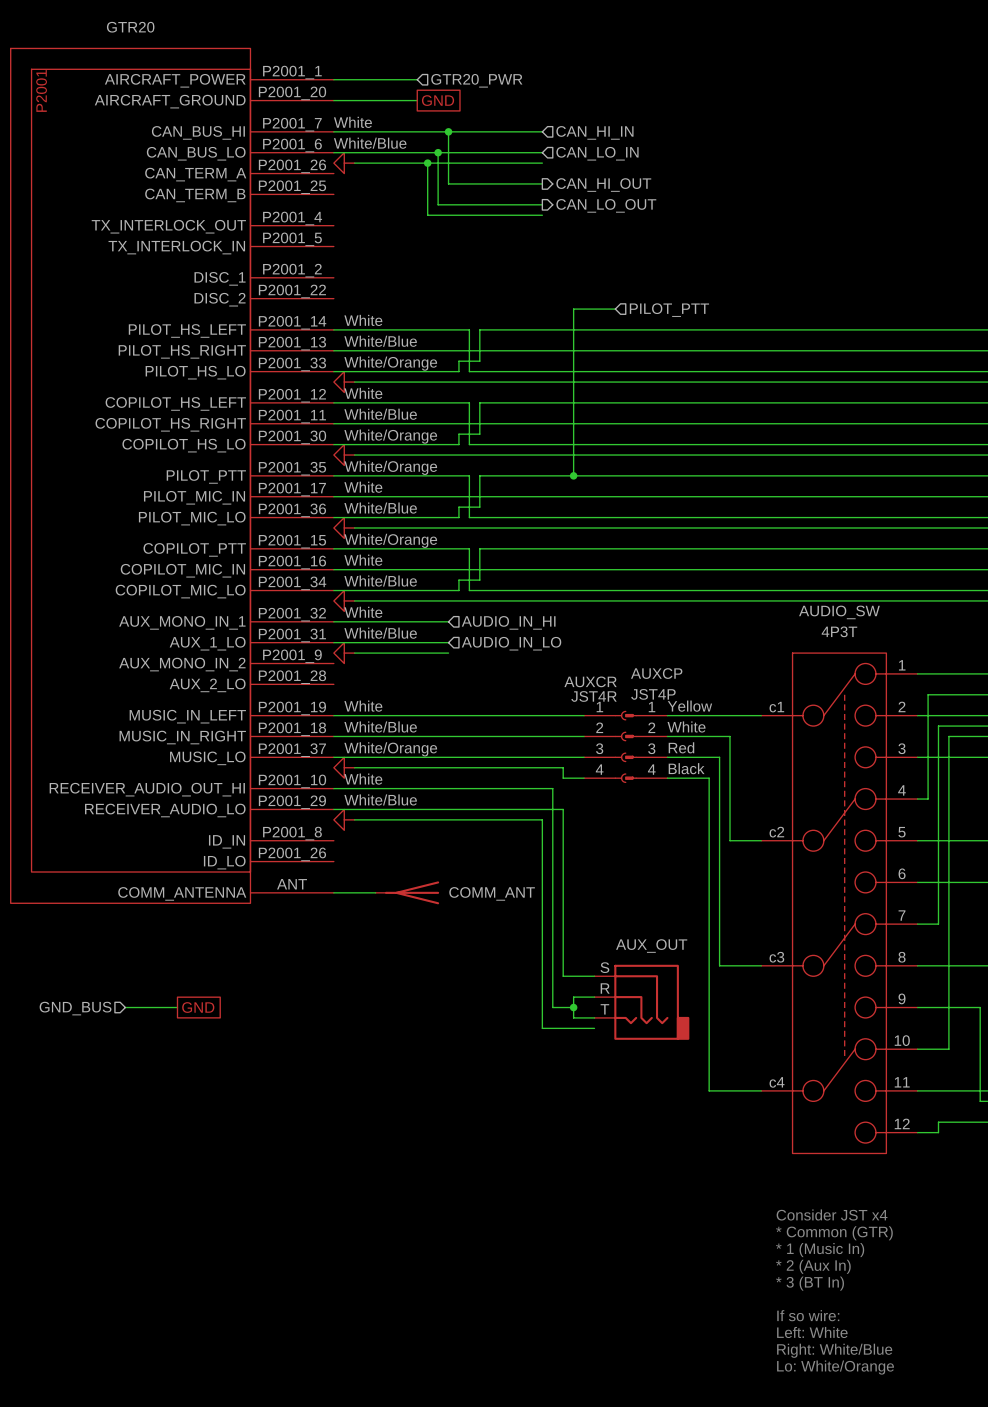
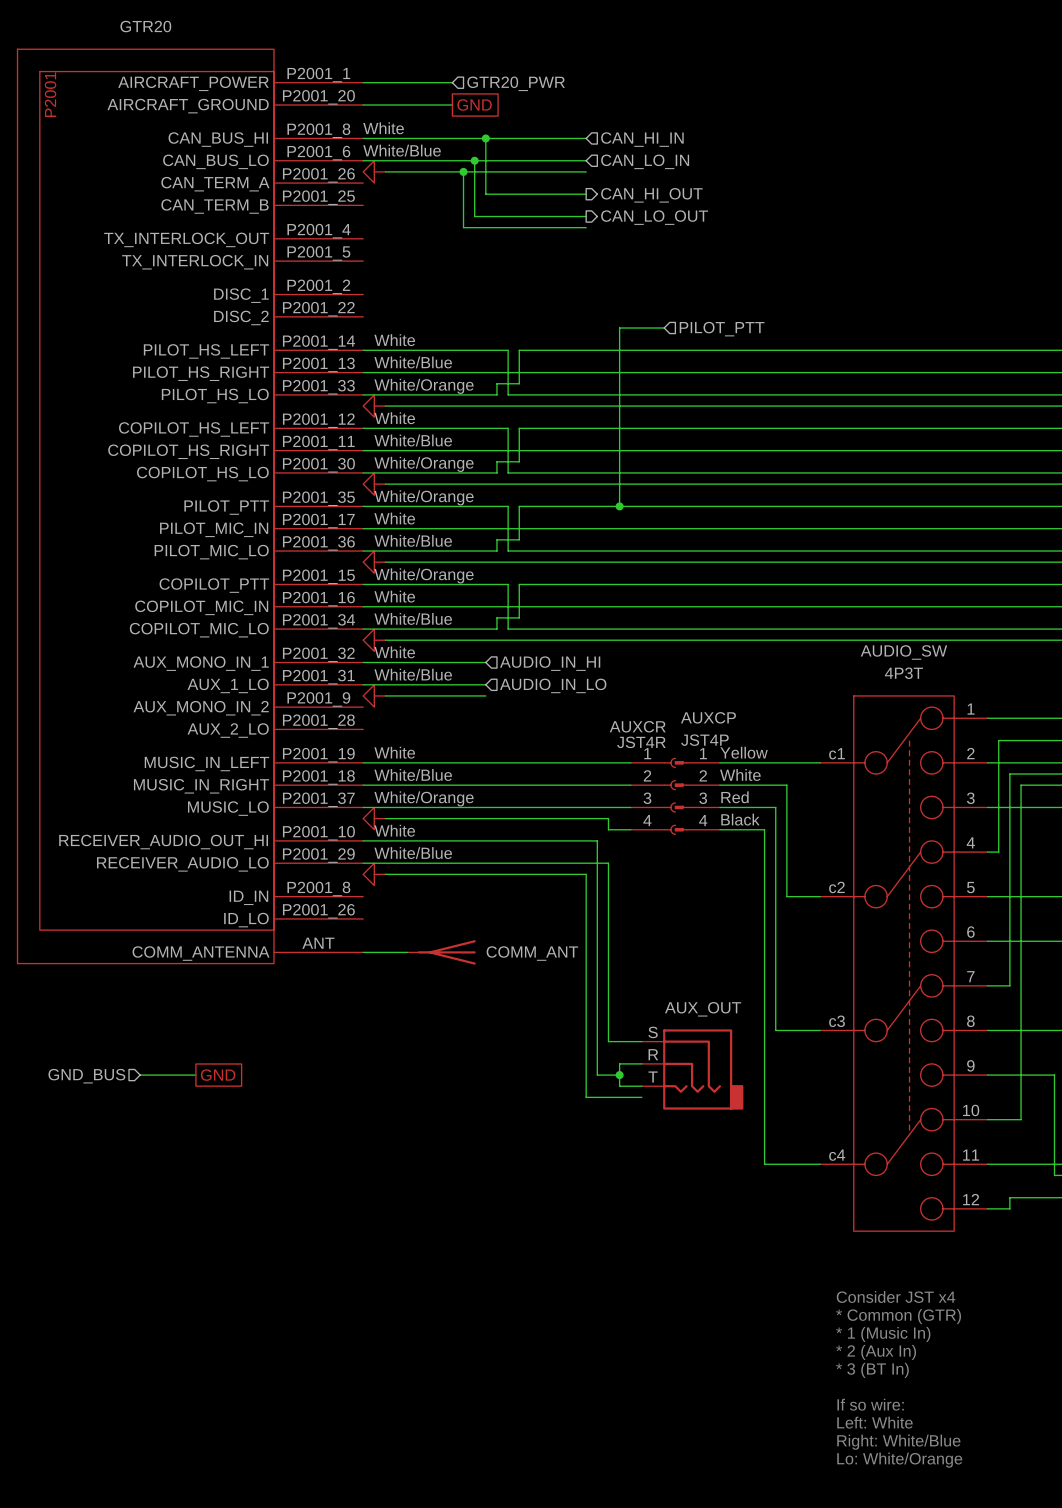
GTR20 pin number: P2001_7 (292, 124) -> P2001_8 (318, 130)

